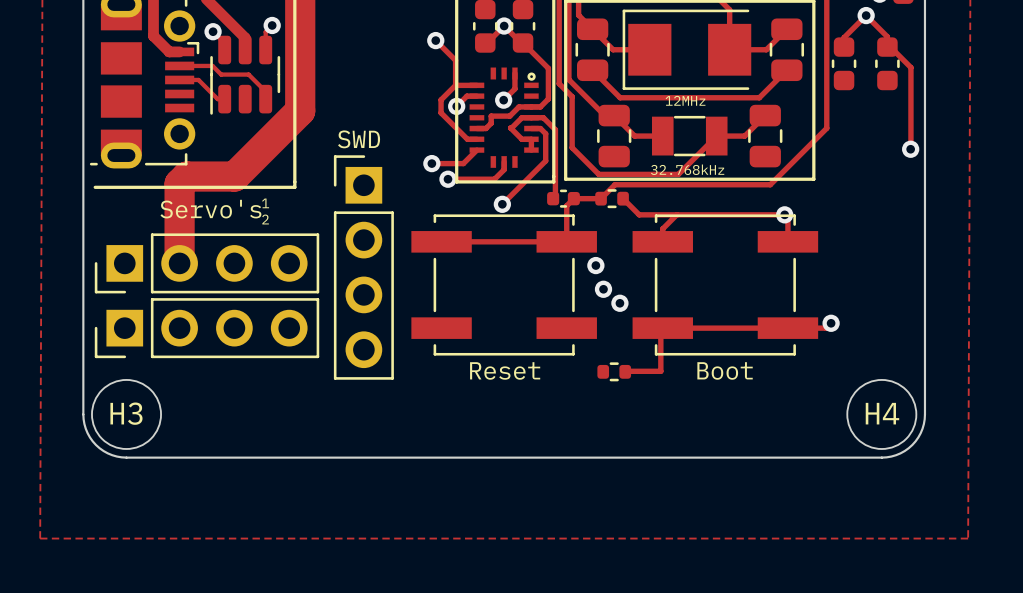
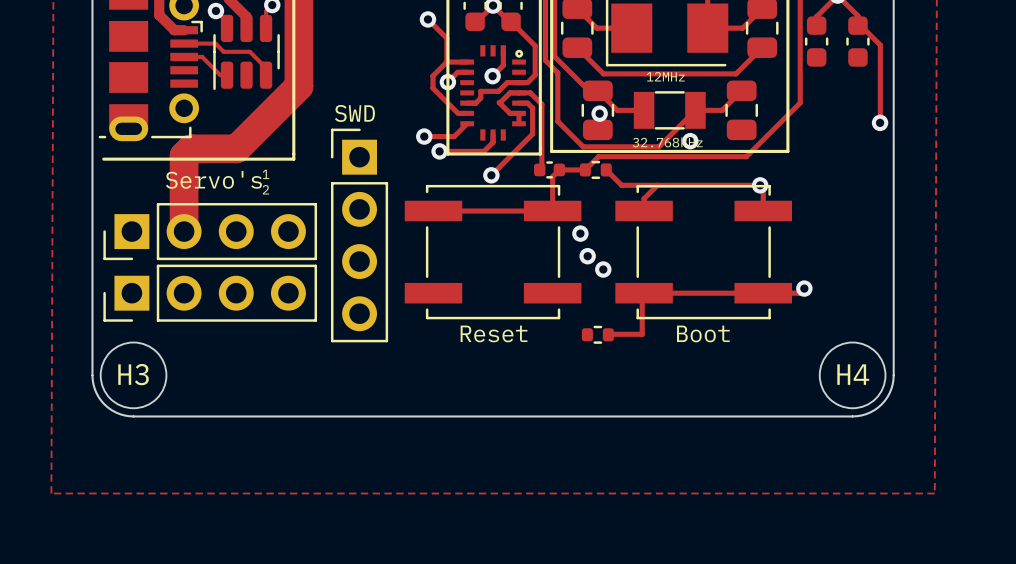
via: none -> (599, 113)
via: none -> (690, 141)

